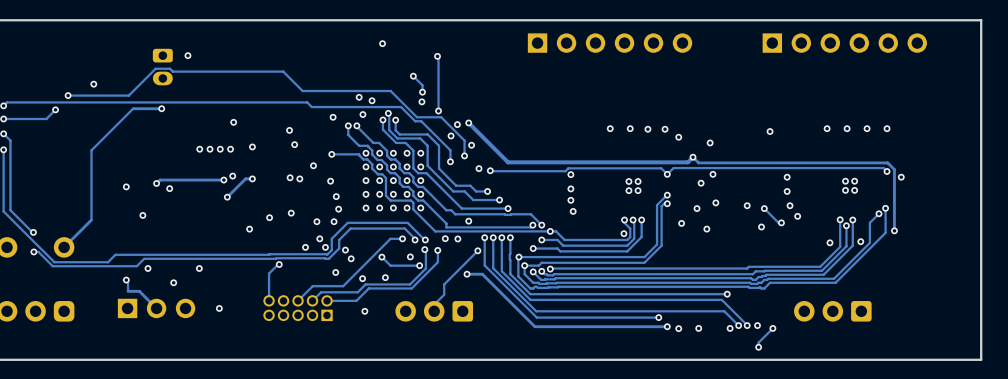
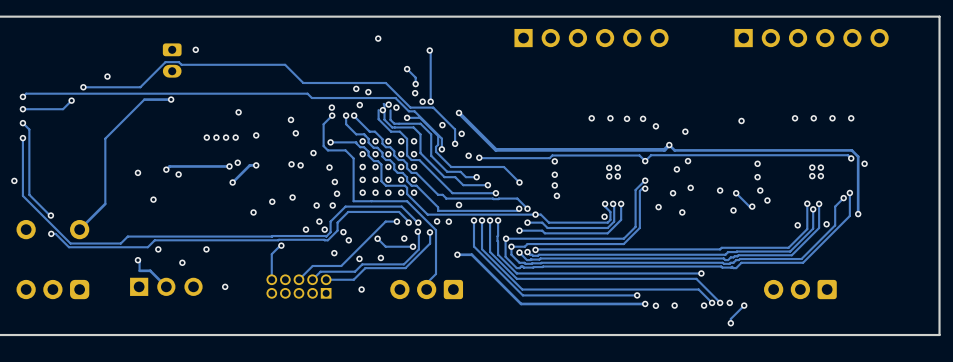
via: none -> (422, 101)
via: (388, 113) -> none
via: none -> (388, 104)
via: none -> (396, 107)
via: (382, 119) -> none
via: none -> (382, 110)
via: (395, 120) -> none
via: (457, 124) -> none
via: none -> (332, 115)
track: none -> (407, 117) (420, 117) (438, 135) (436, 151) (451, 167) (503, 167) (519, 182)
via: none -> (407, 117)
via: none -> (519, 182)
track: (477, 250) (444, 284) -> (332, 115) (323, 124) (323, 146) (327, 150) (345, 150) (353, 158) (353, 201) (407, 201) (436, 230) (436, 264)
via: (477, 250) -> none

